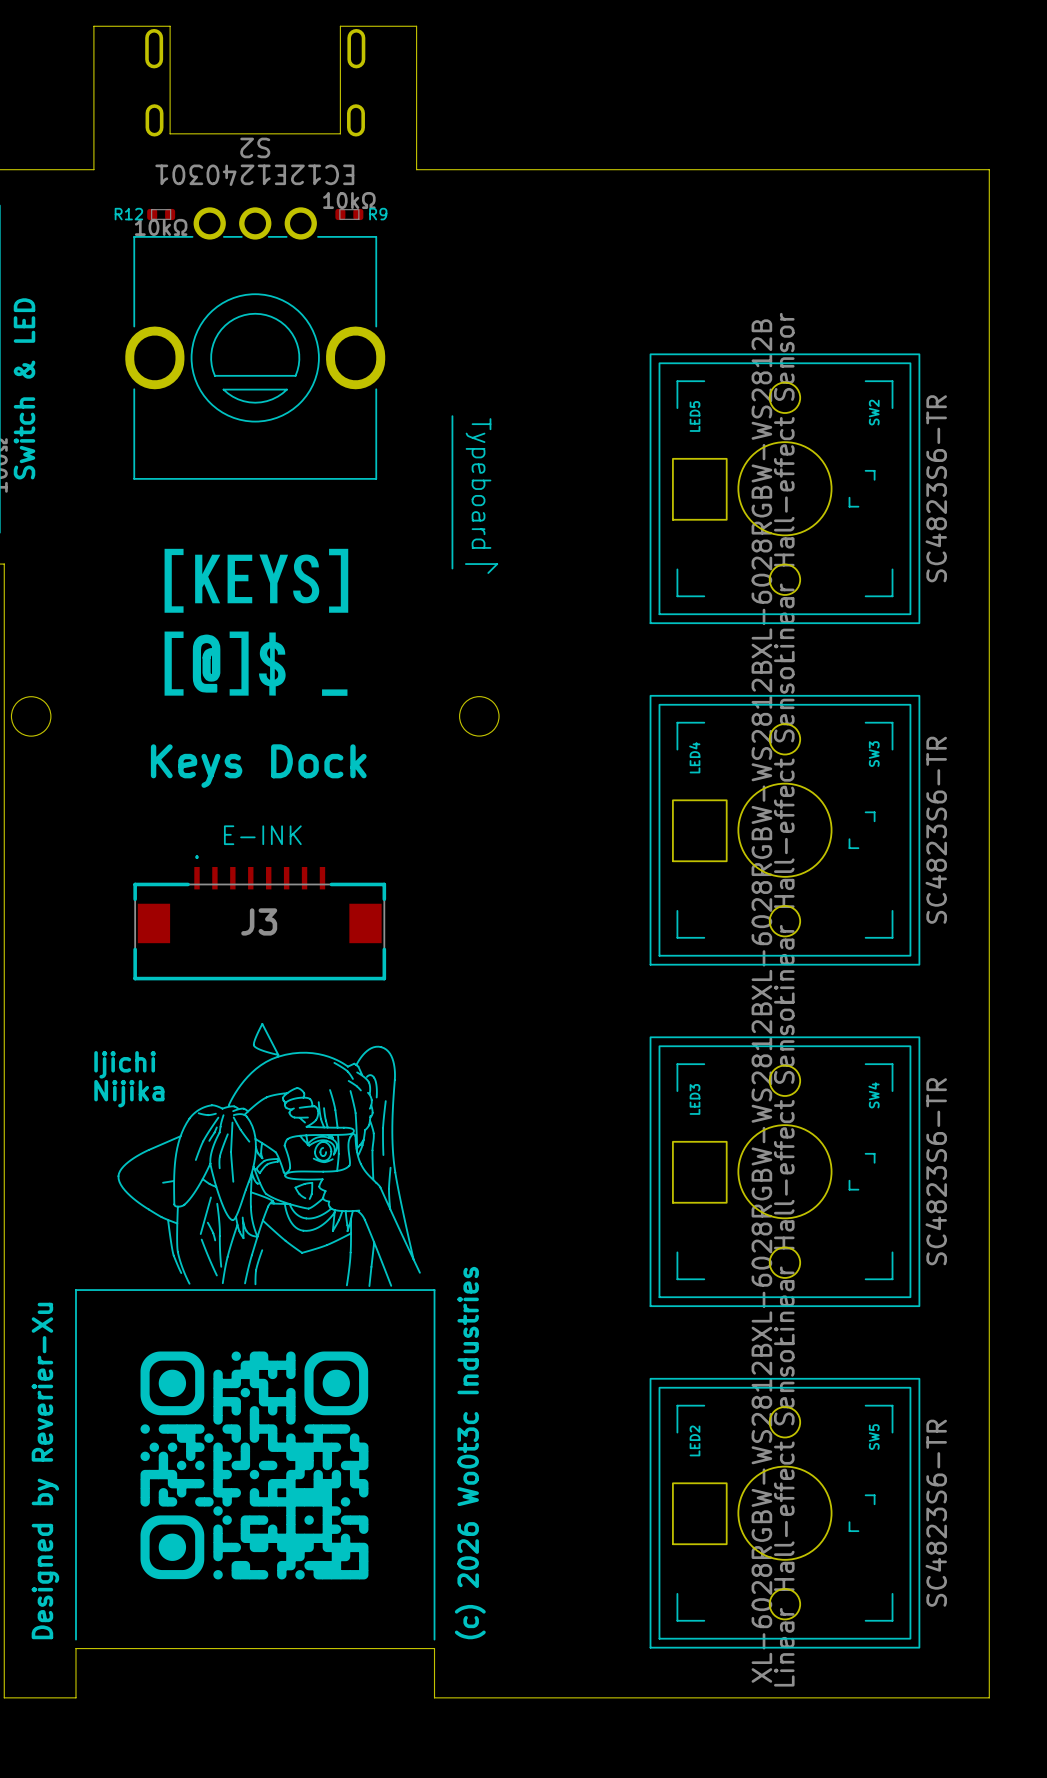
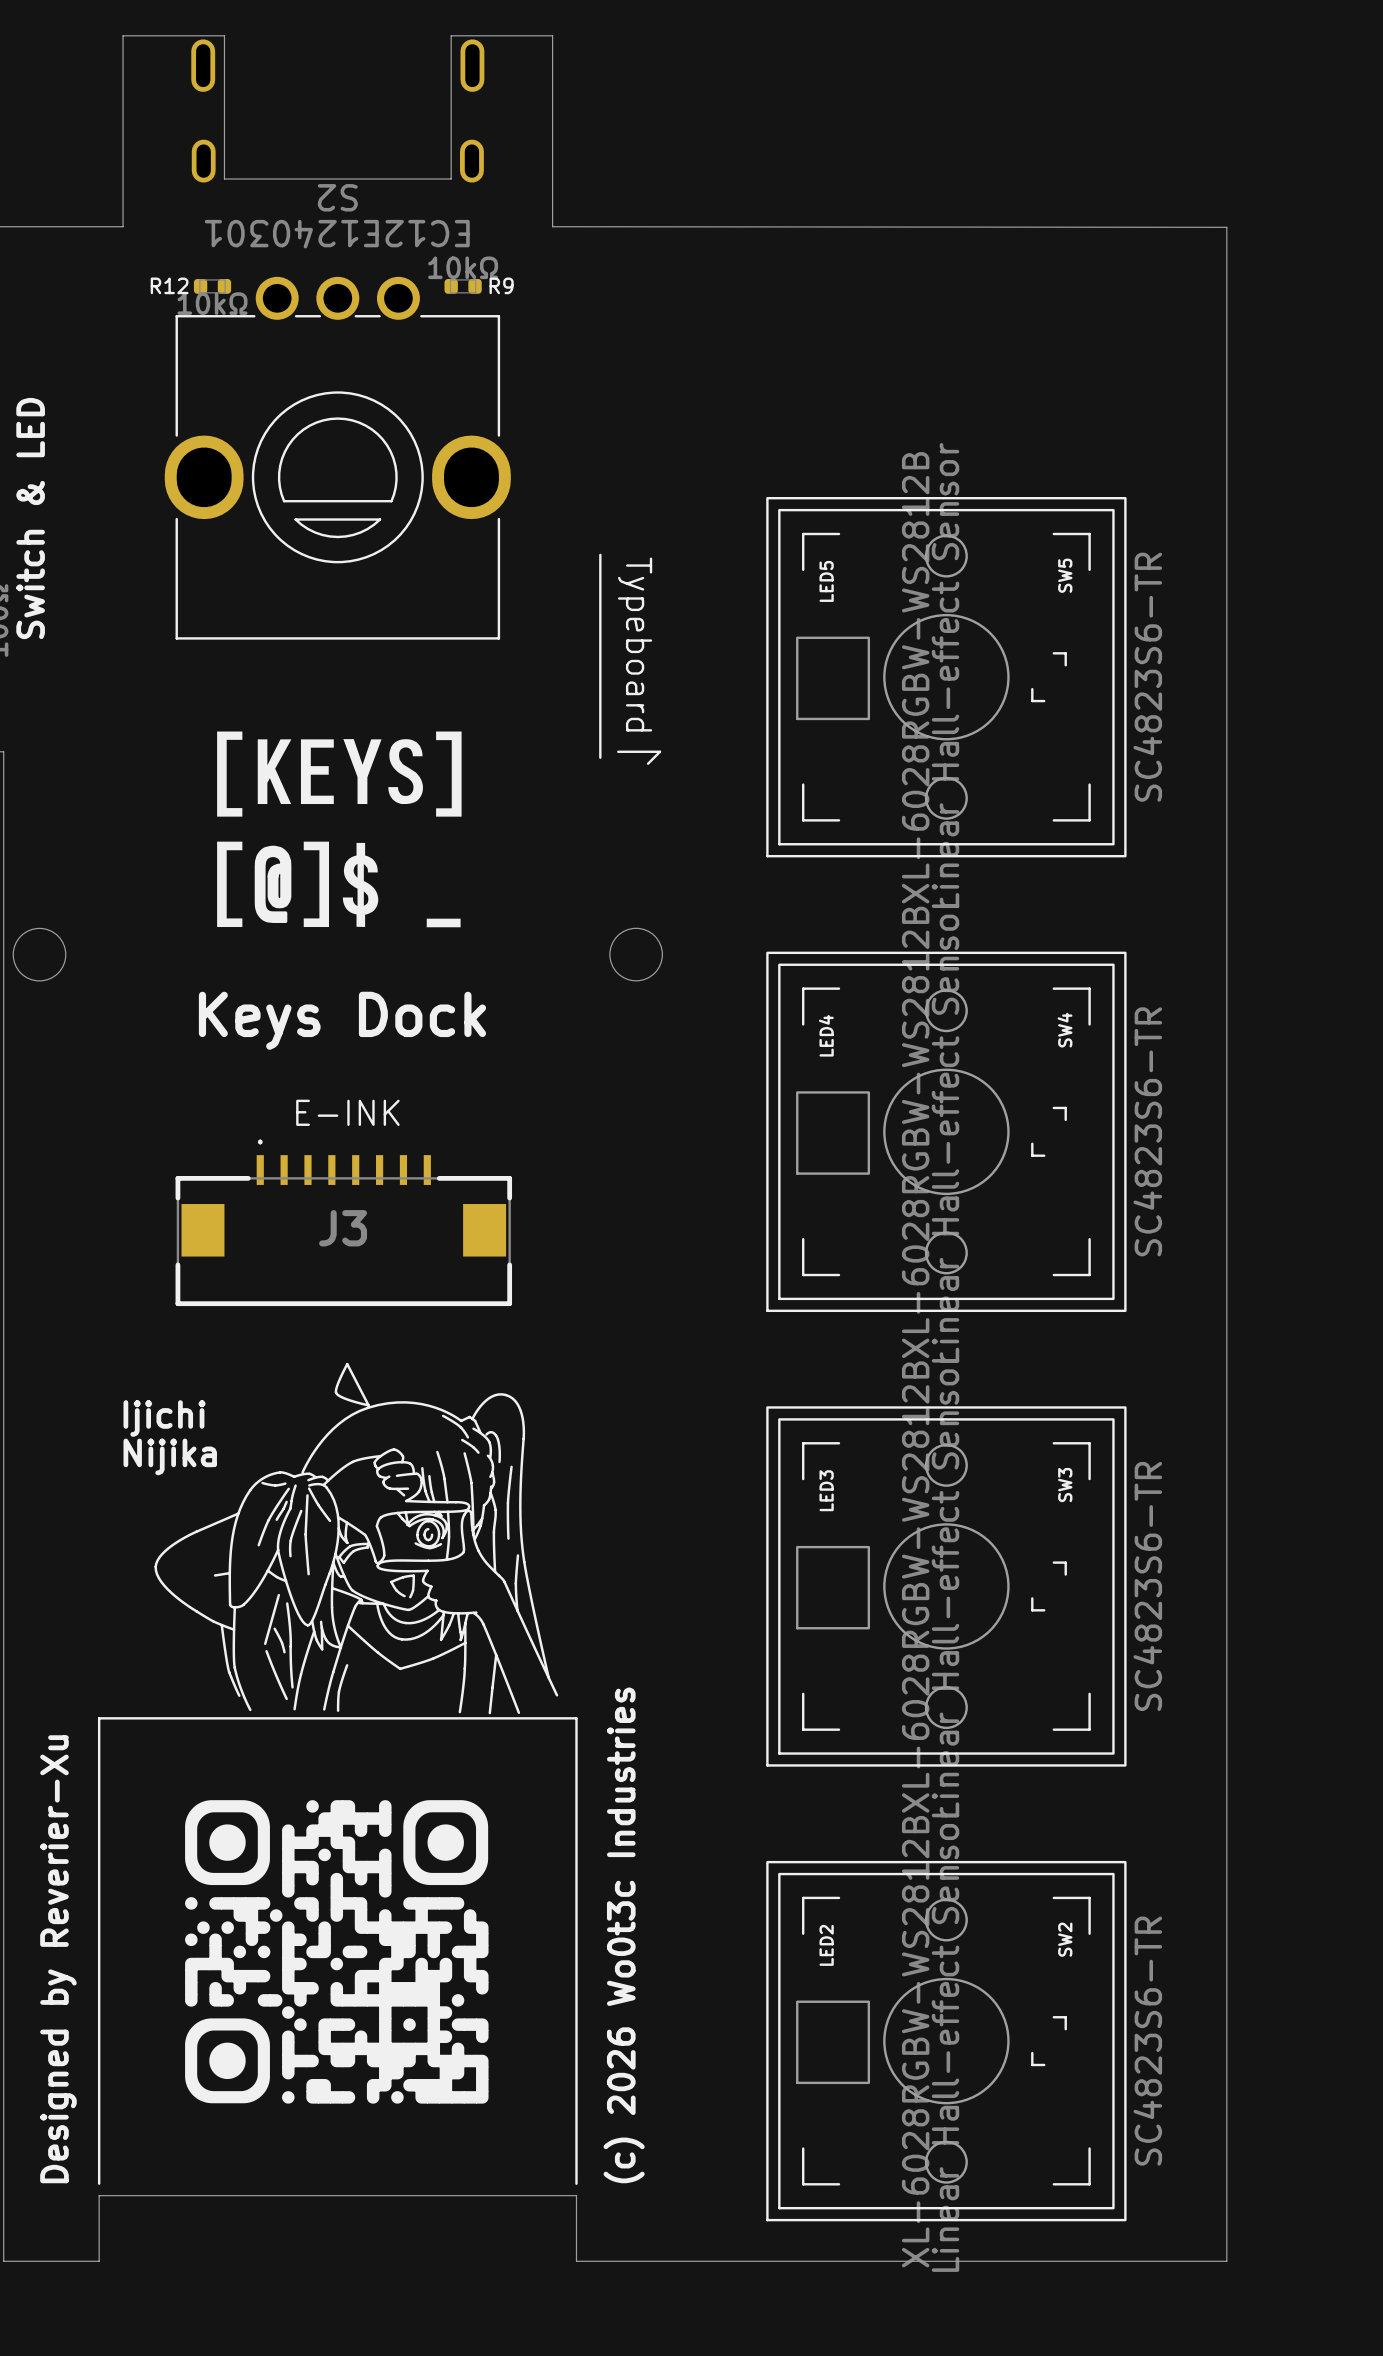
board edge: (416, 169) (989, 169) (989, 1697) (922, 1697) -> (552, 226) (1226, 227) (1226, 2261)
SW2 position: (784, 488) -> (946, 2041)
LED5 position: (699, 489) -> (833, 678)
LED4 position: (699, 830) -> (833, 1133)
SW3 position: (784, 830) -> (946, 1586)
SW4 position: (784, 1171) -> (946, 1131)
LED3 position: (699, 1172) -> (833, 1587)
LED2 position: (699, 1513) -> (833, 2042)
SW5 position: (784, 1513) -> (946, 677)

